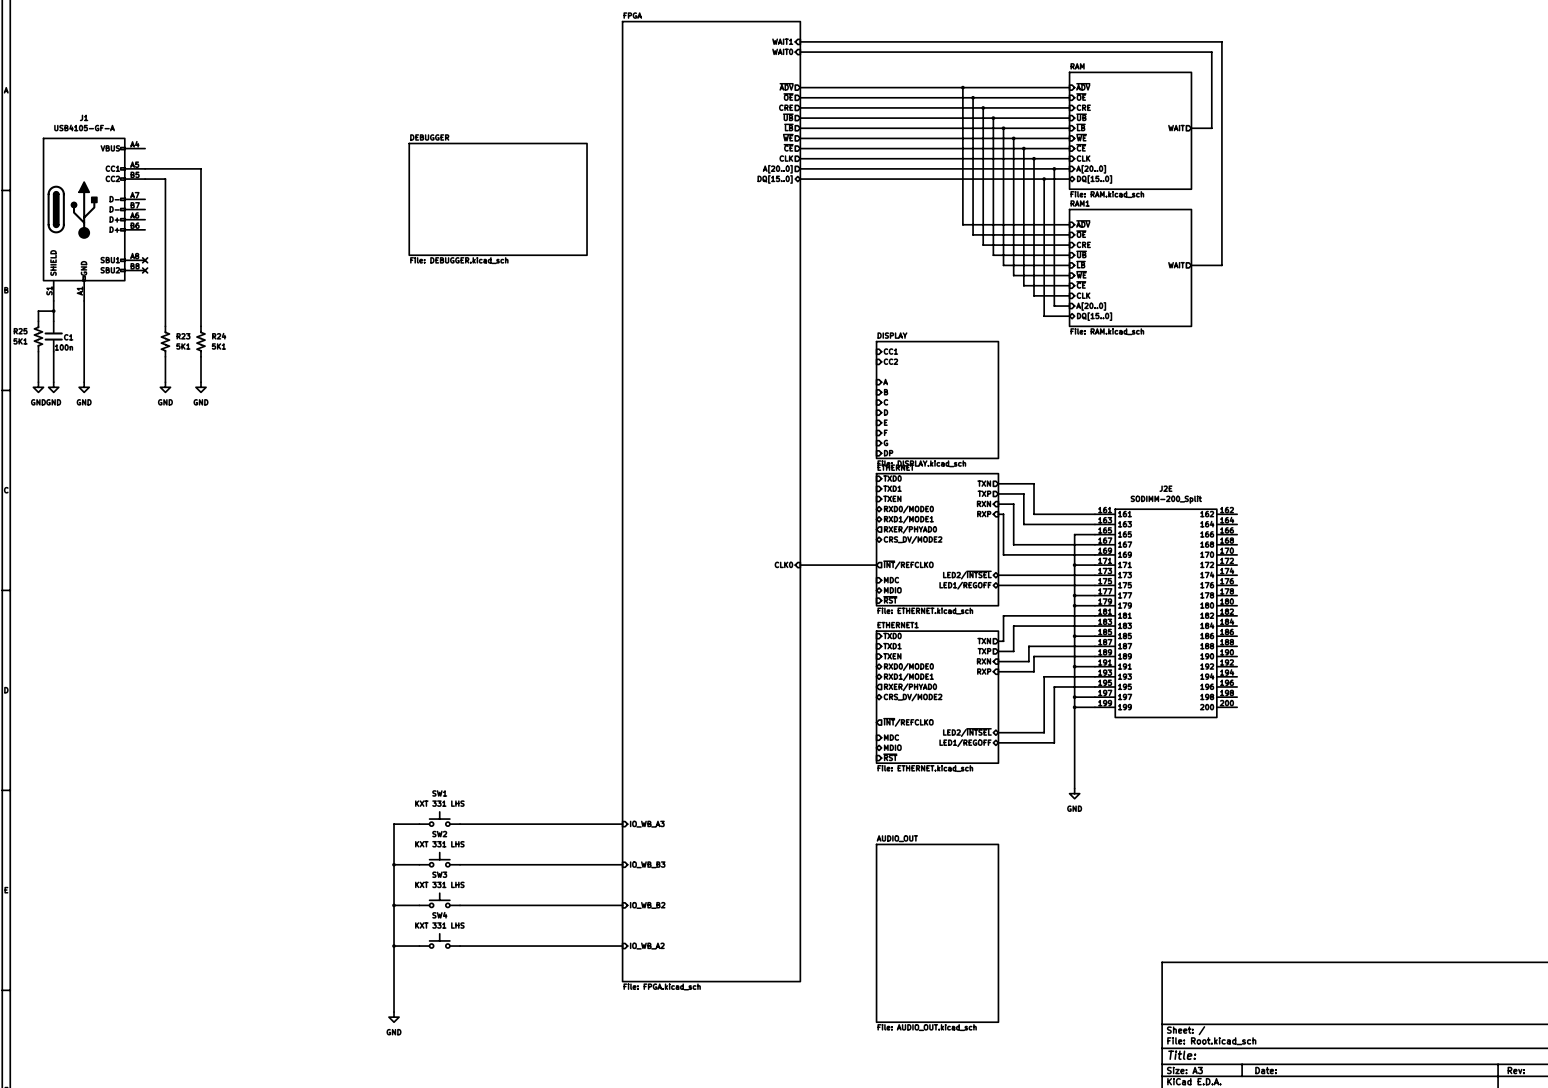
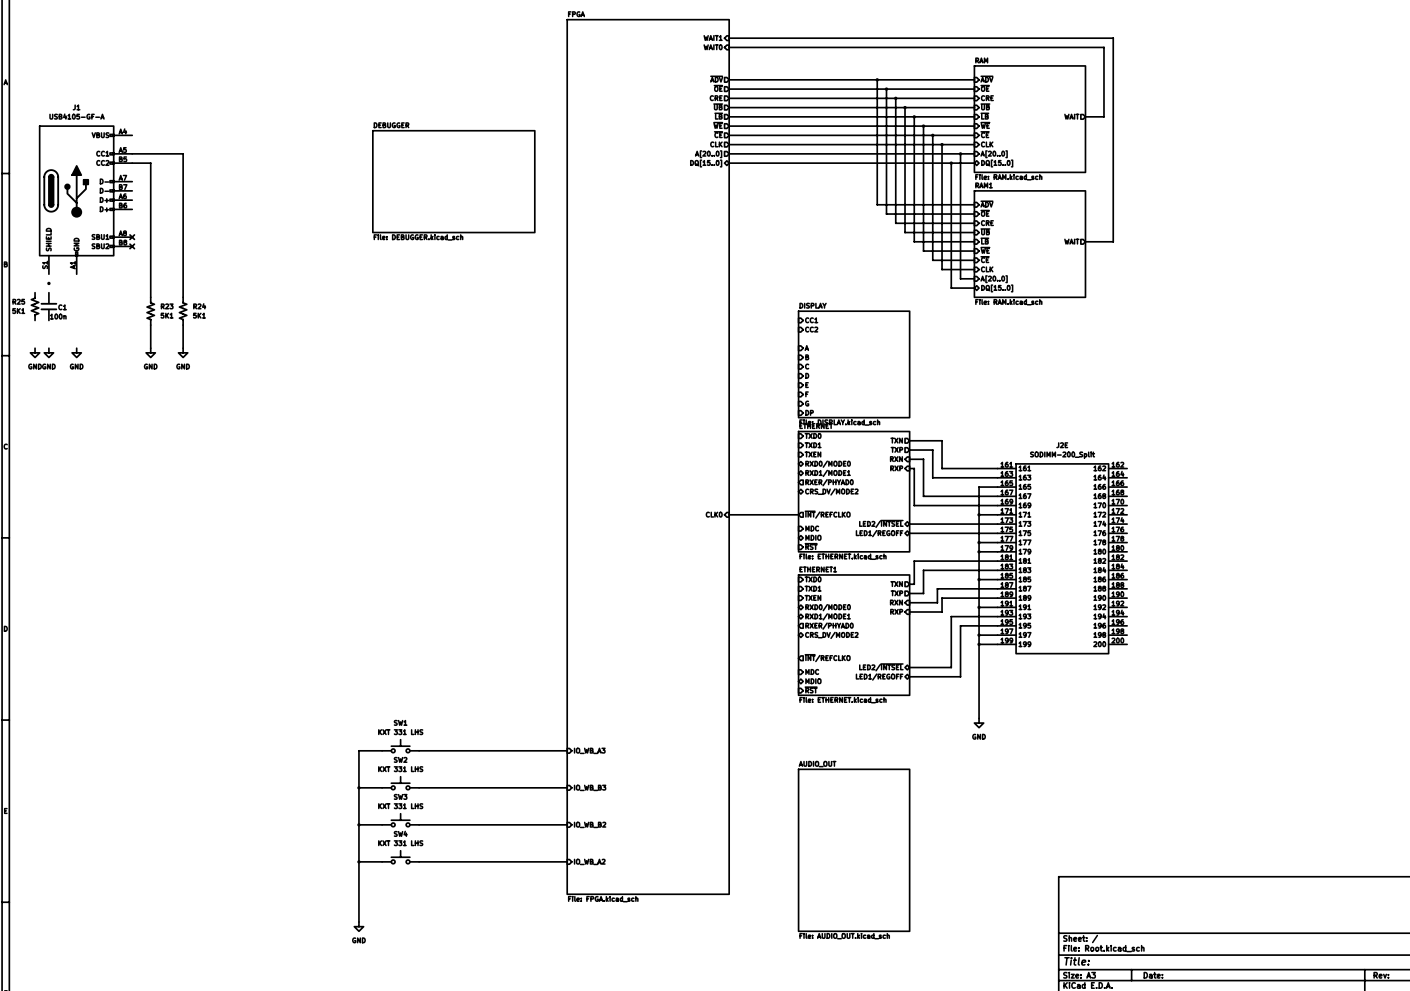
wire: (53, 300) (53, 321) -> none
wire: (84, 300) (84, 382) -> none
wire: (53, 311) (38, 311) (38, 321) -> none
wire: (38, 351) (38, 382) -> none
wire: (53, 351) (53, 382) -> none

